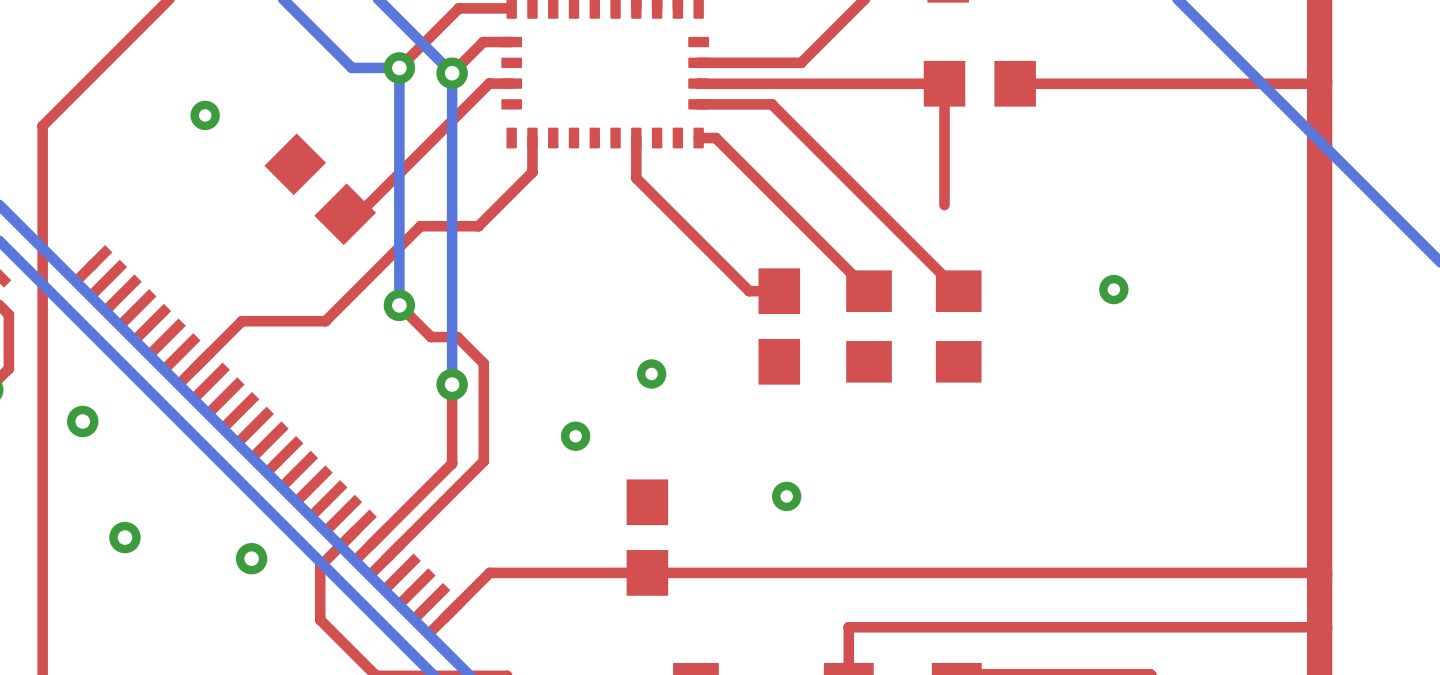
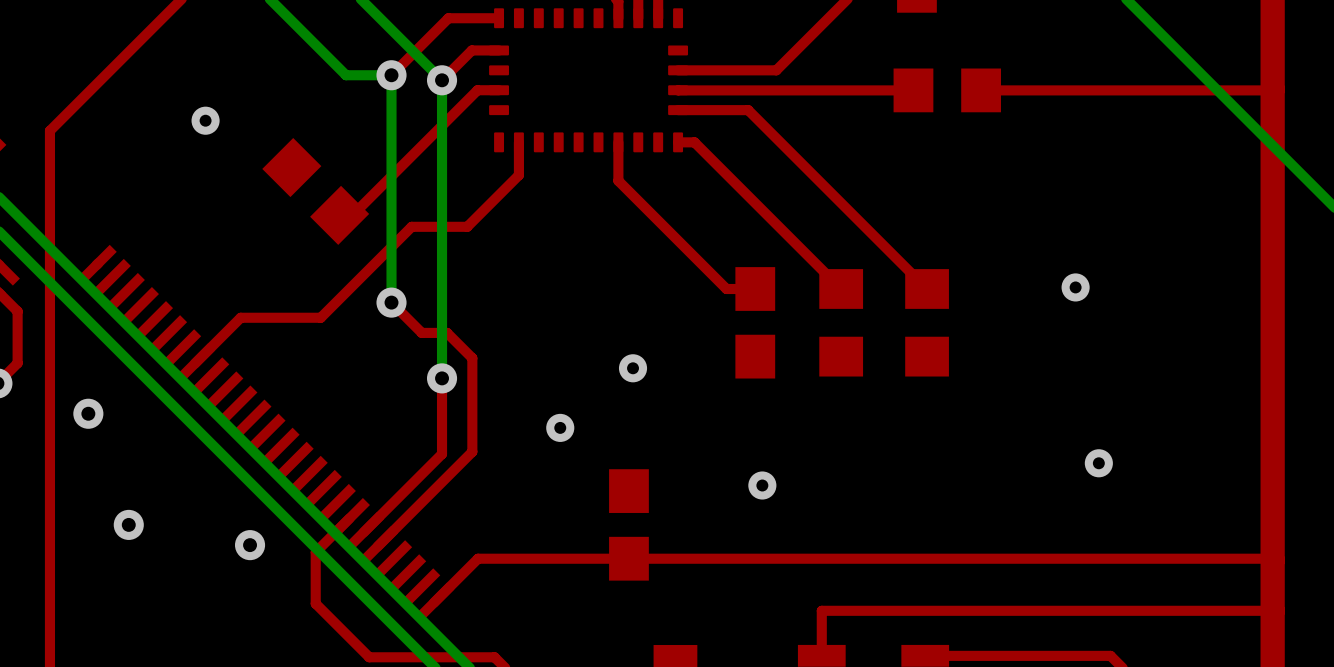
top track: (944, 83) (944, 205) -> none
via: none -> (1098, 463)

